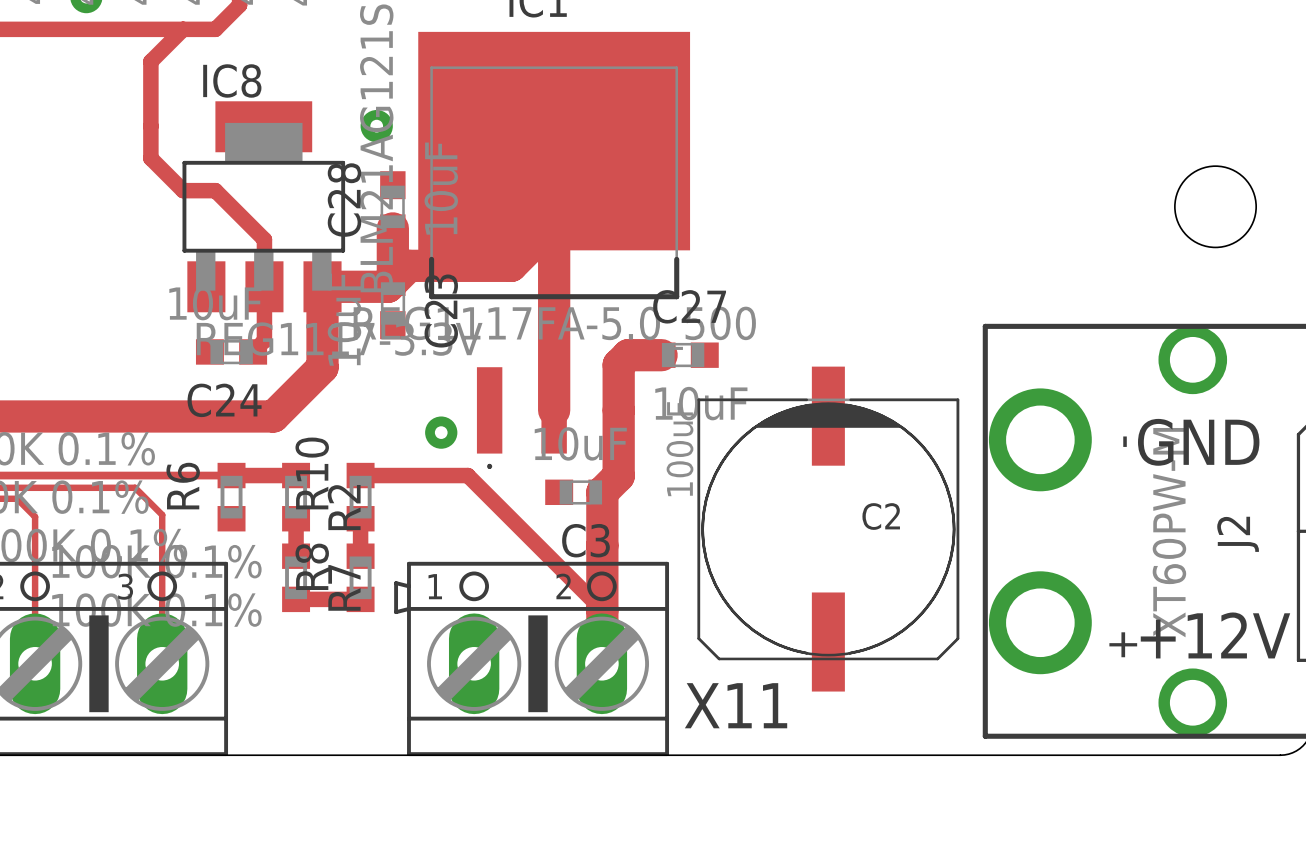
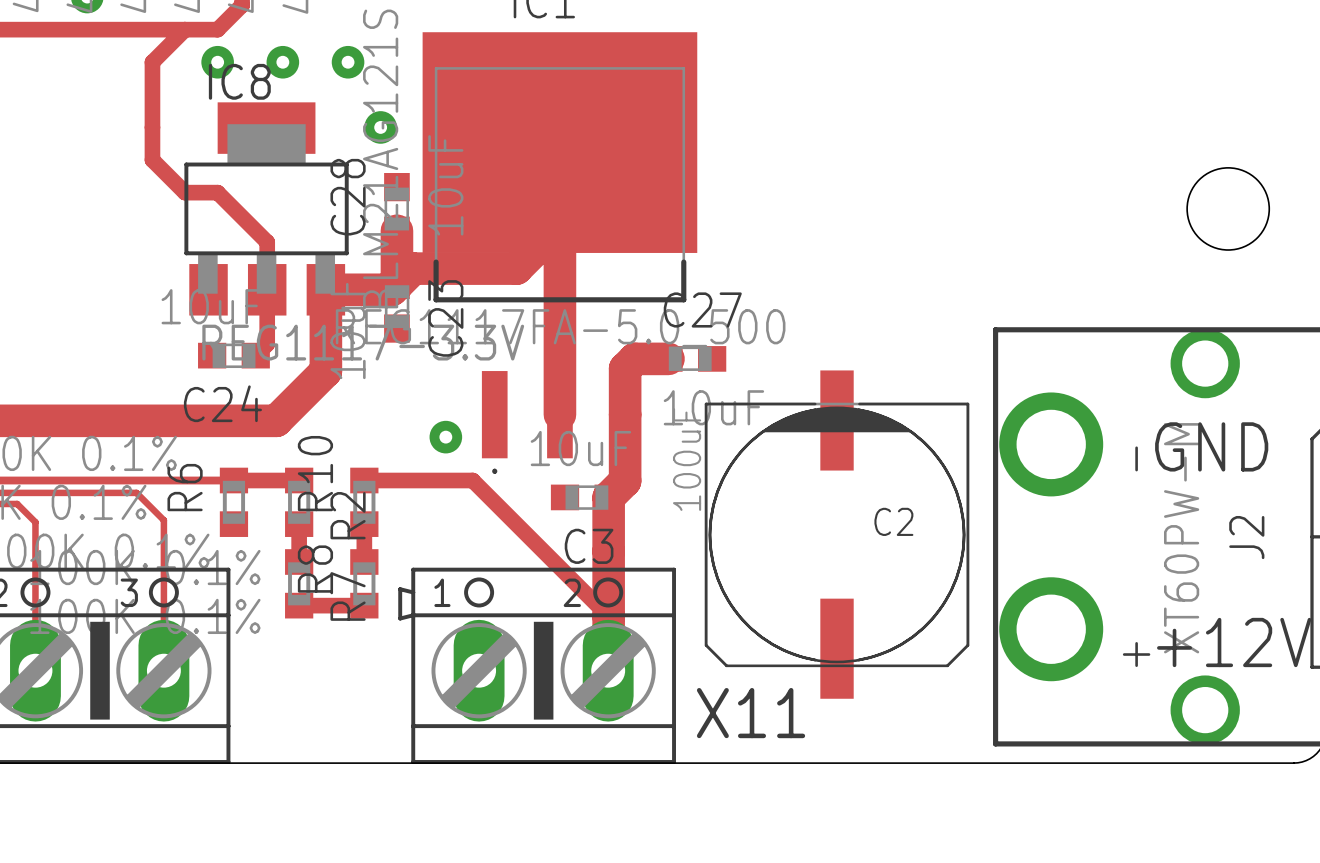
via: none -> (217, 62)
via: none -> (282, 62)
via: none -> (348, 62)

